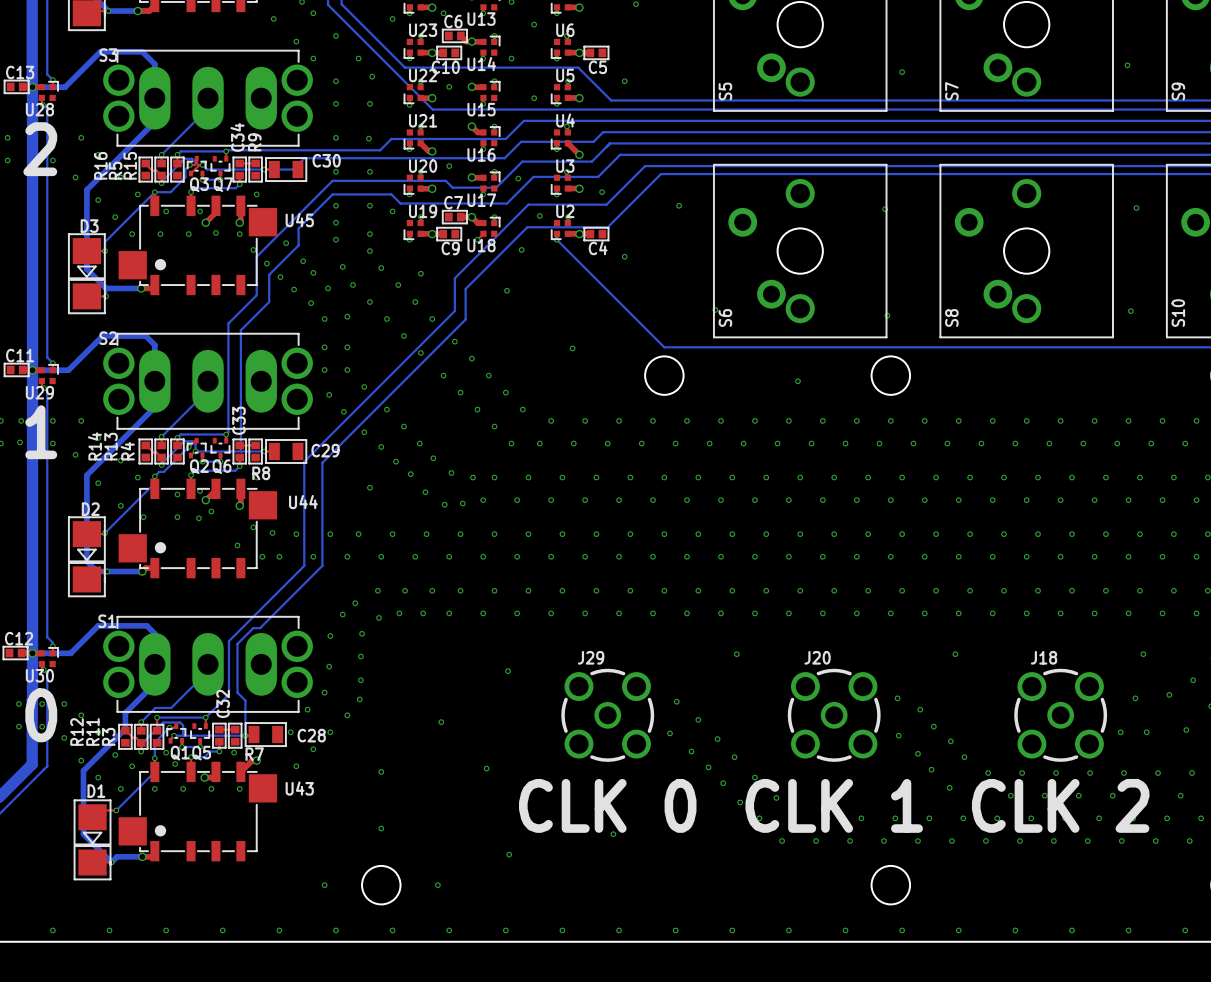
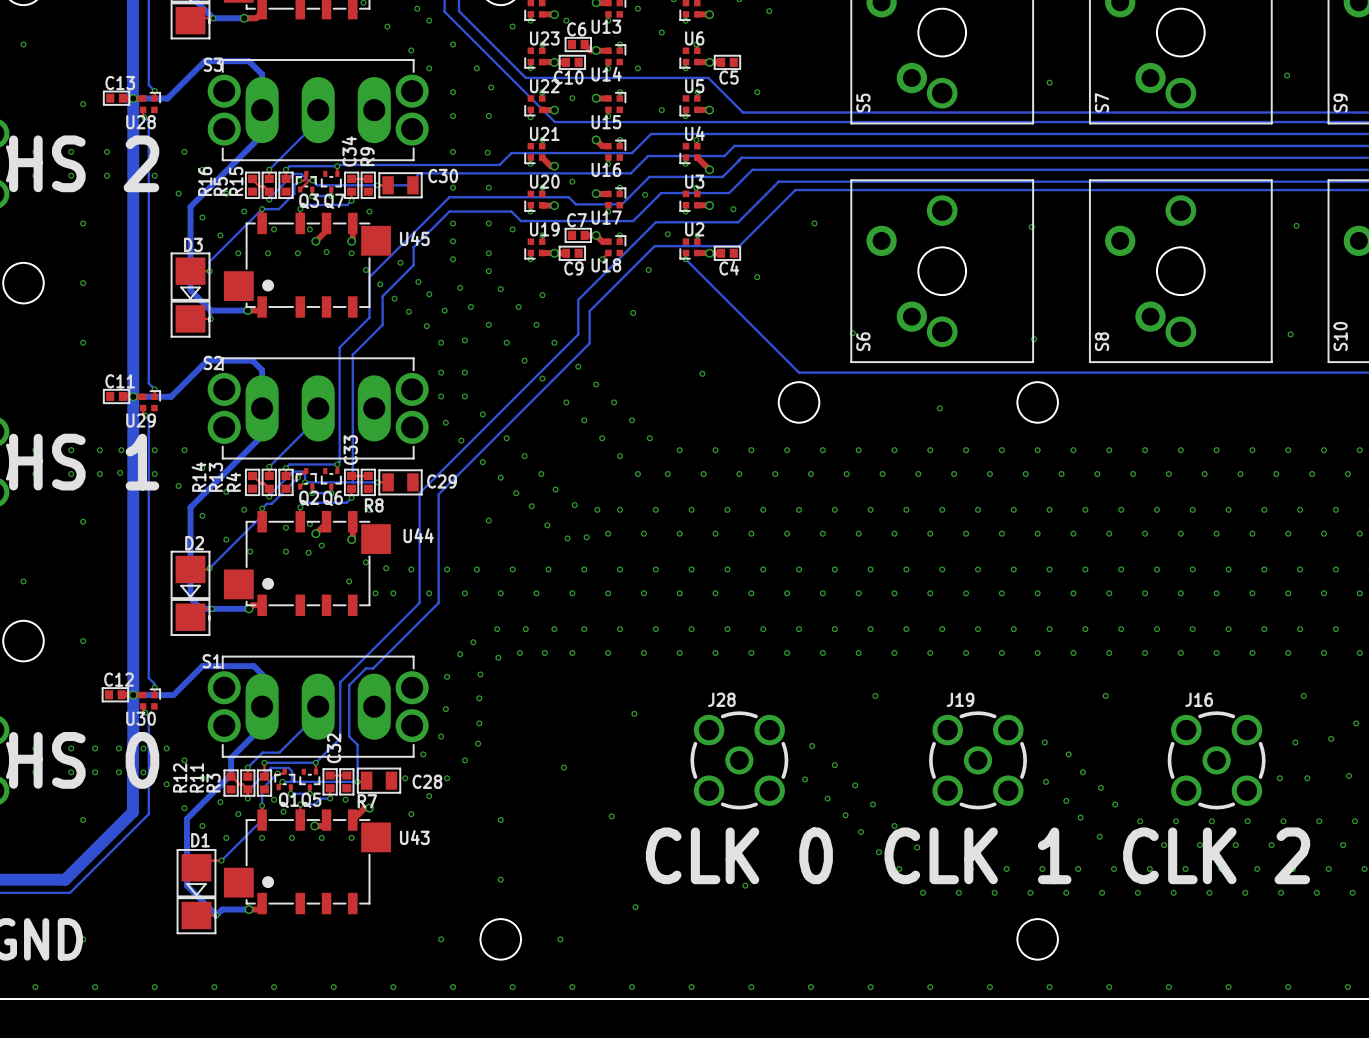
J29 name: J29 (591, 657) -> J28 (721, 699)
J20 name: J20 (817, 657) -> J19 (960, 699)
J18 name: J18 (1044, 657) -> J16 (1199, 699)

